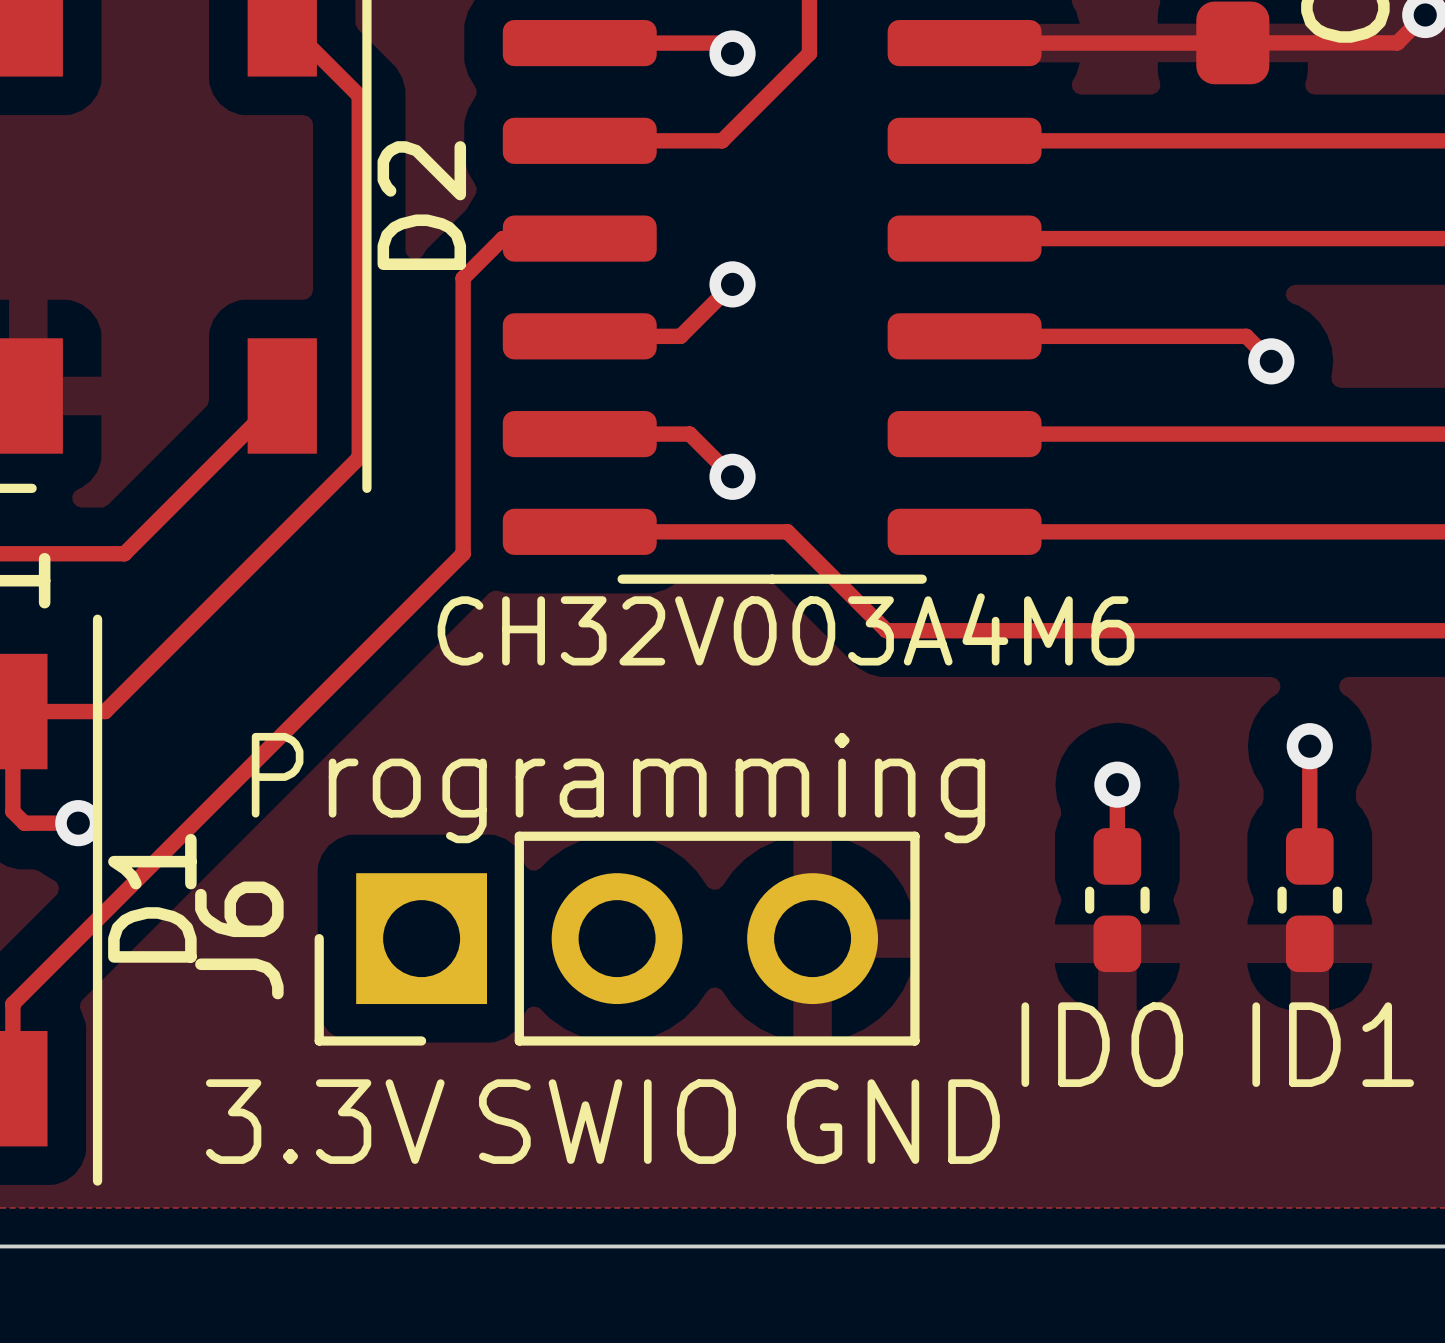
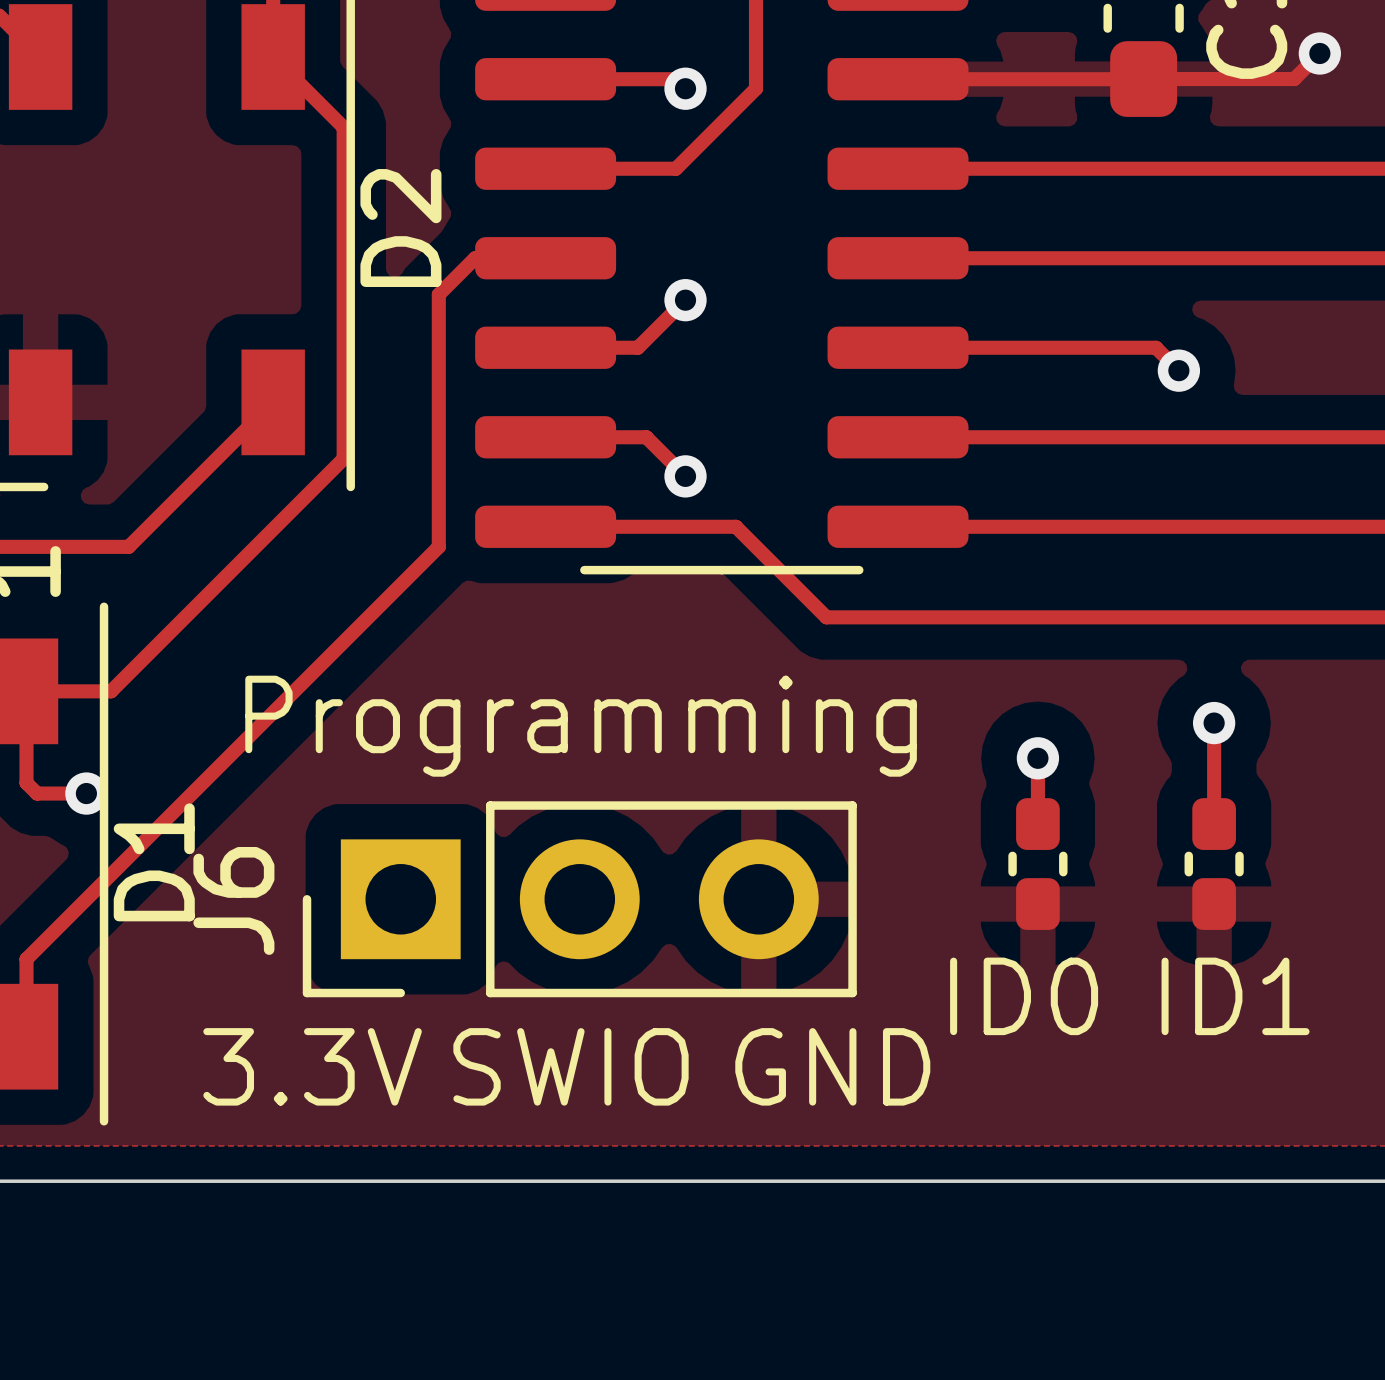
text: CH32V003A4M6 (785, 629) -> none
text position: Programming (618, 788) -> Programming (581, 726)

